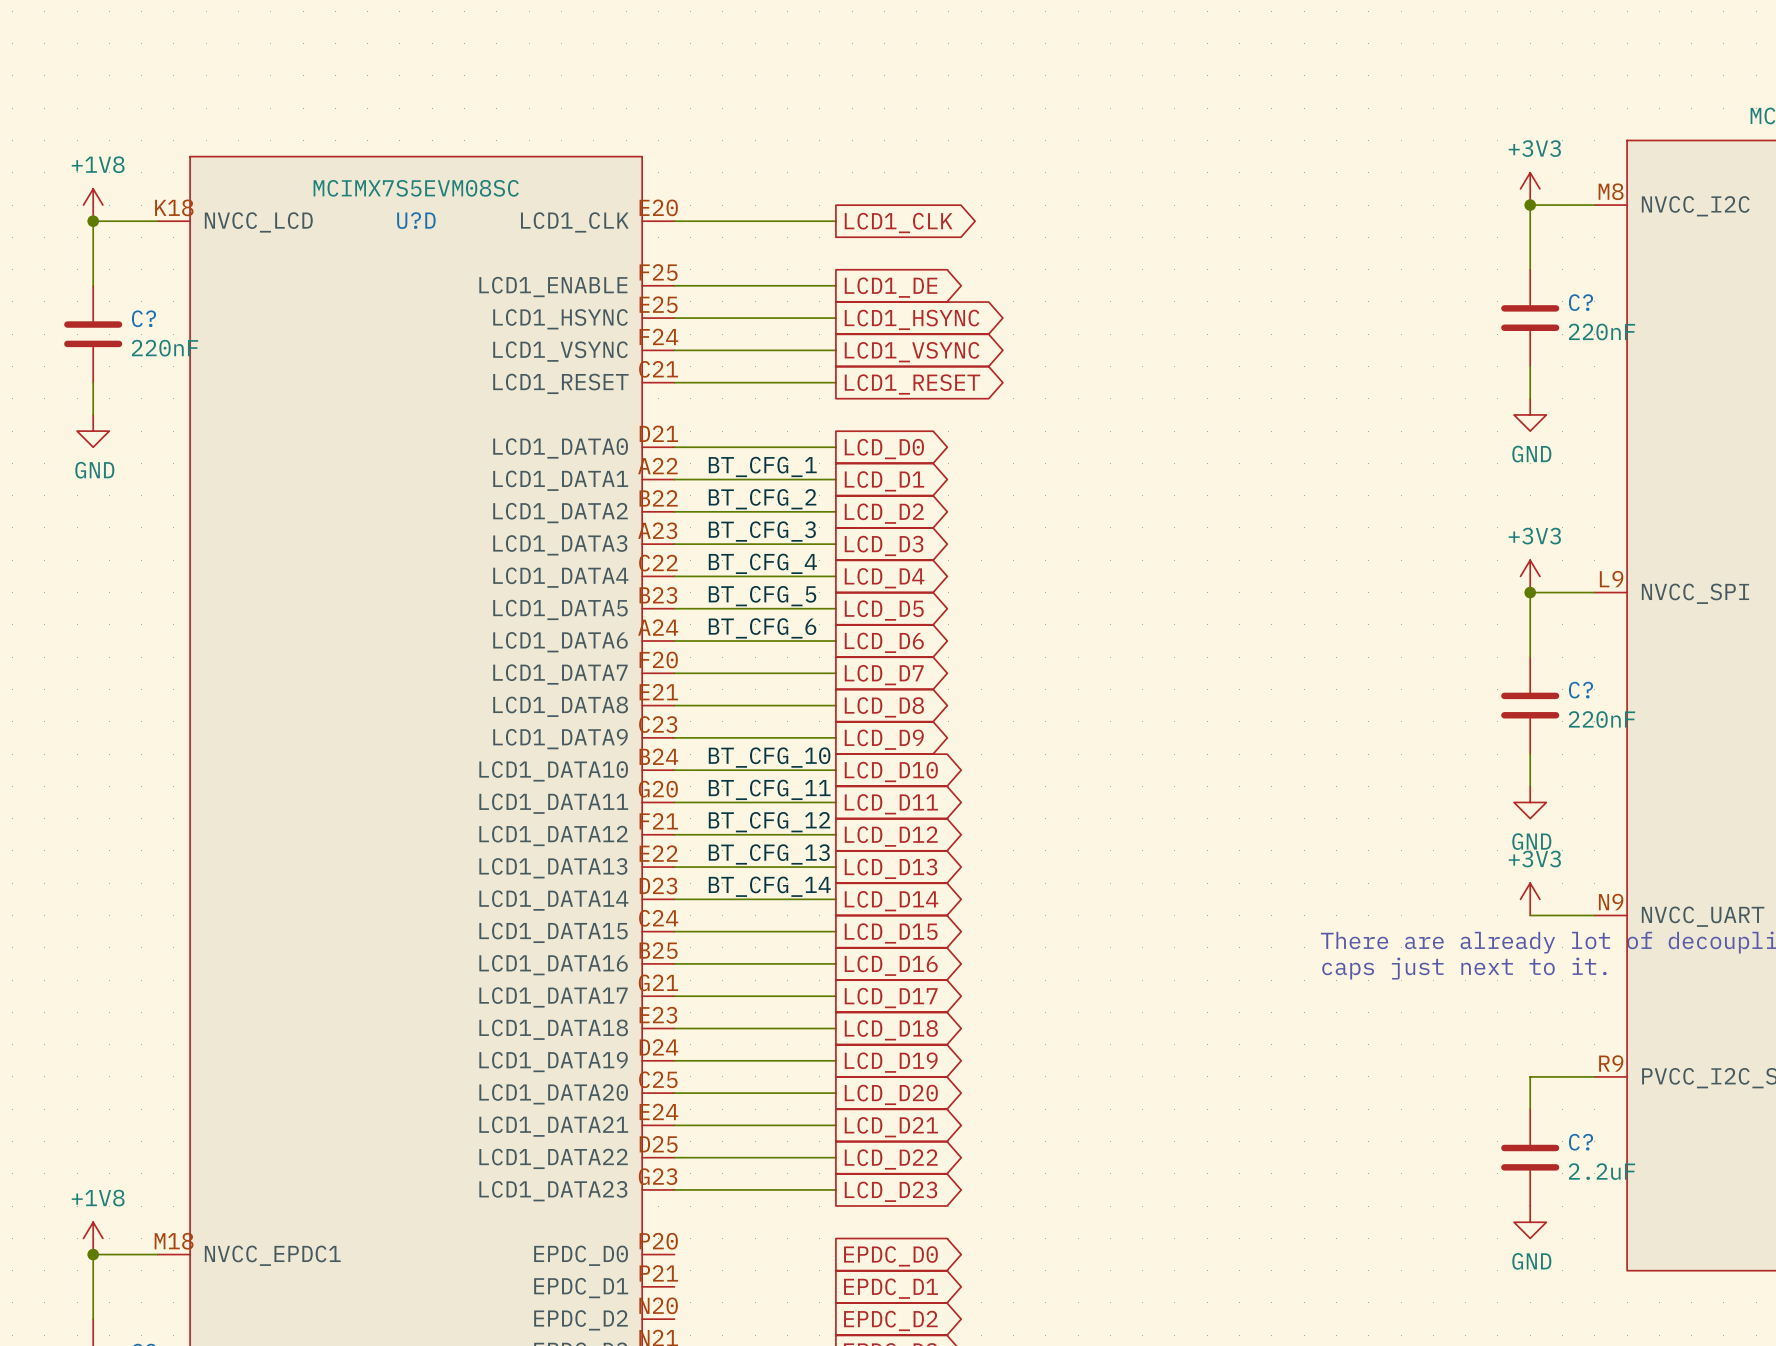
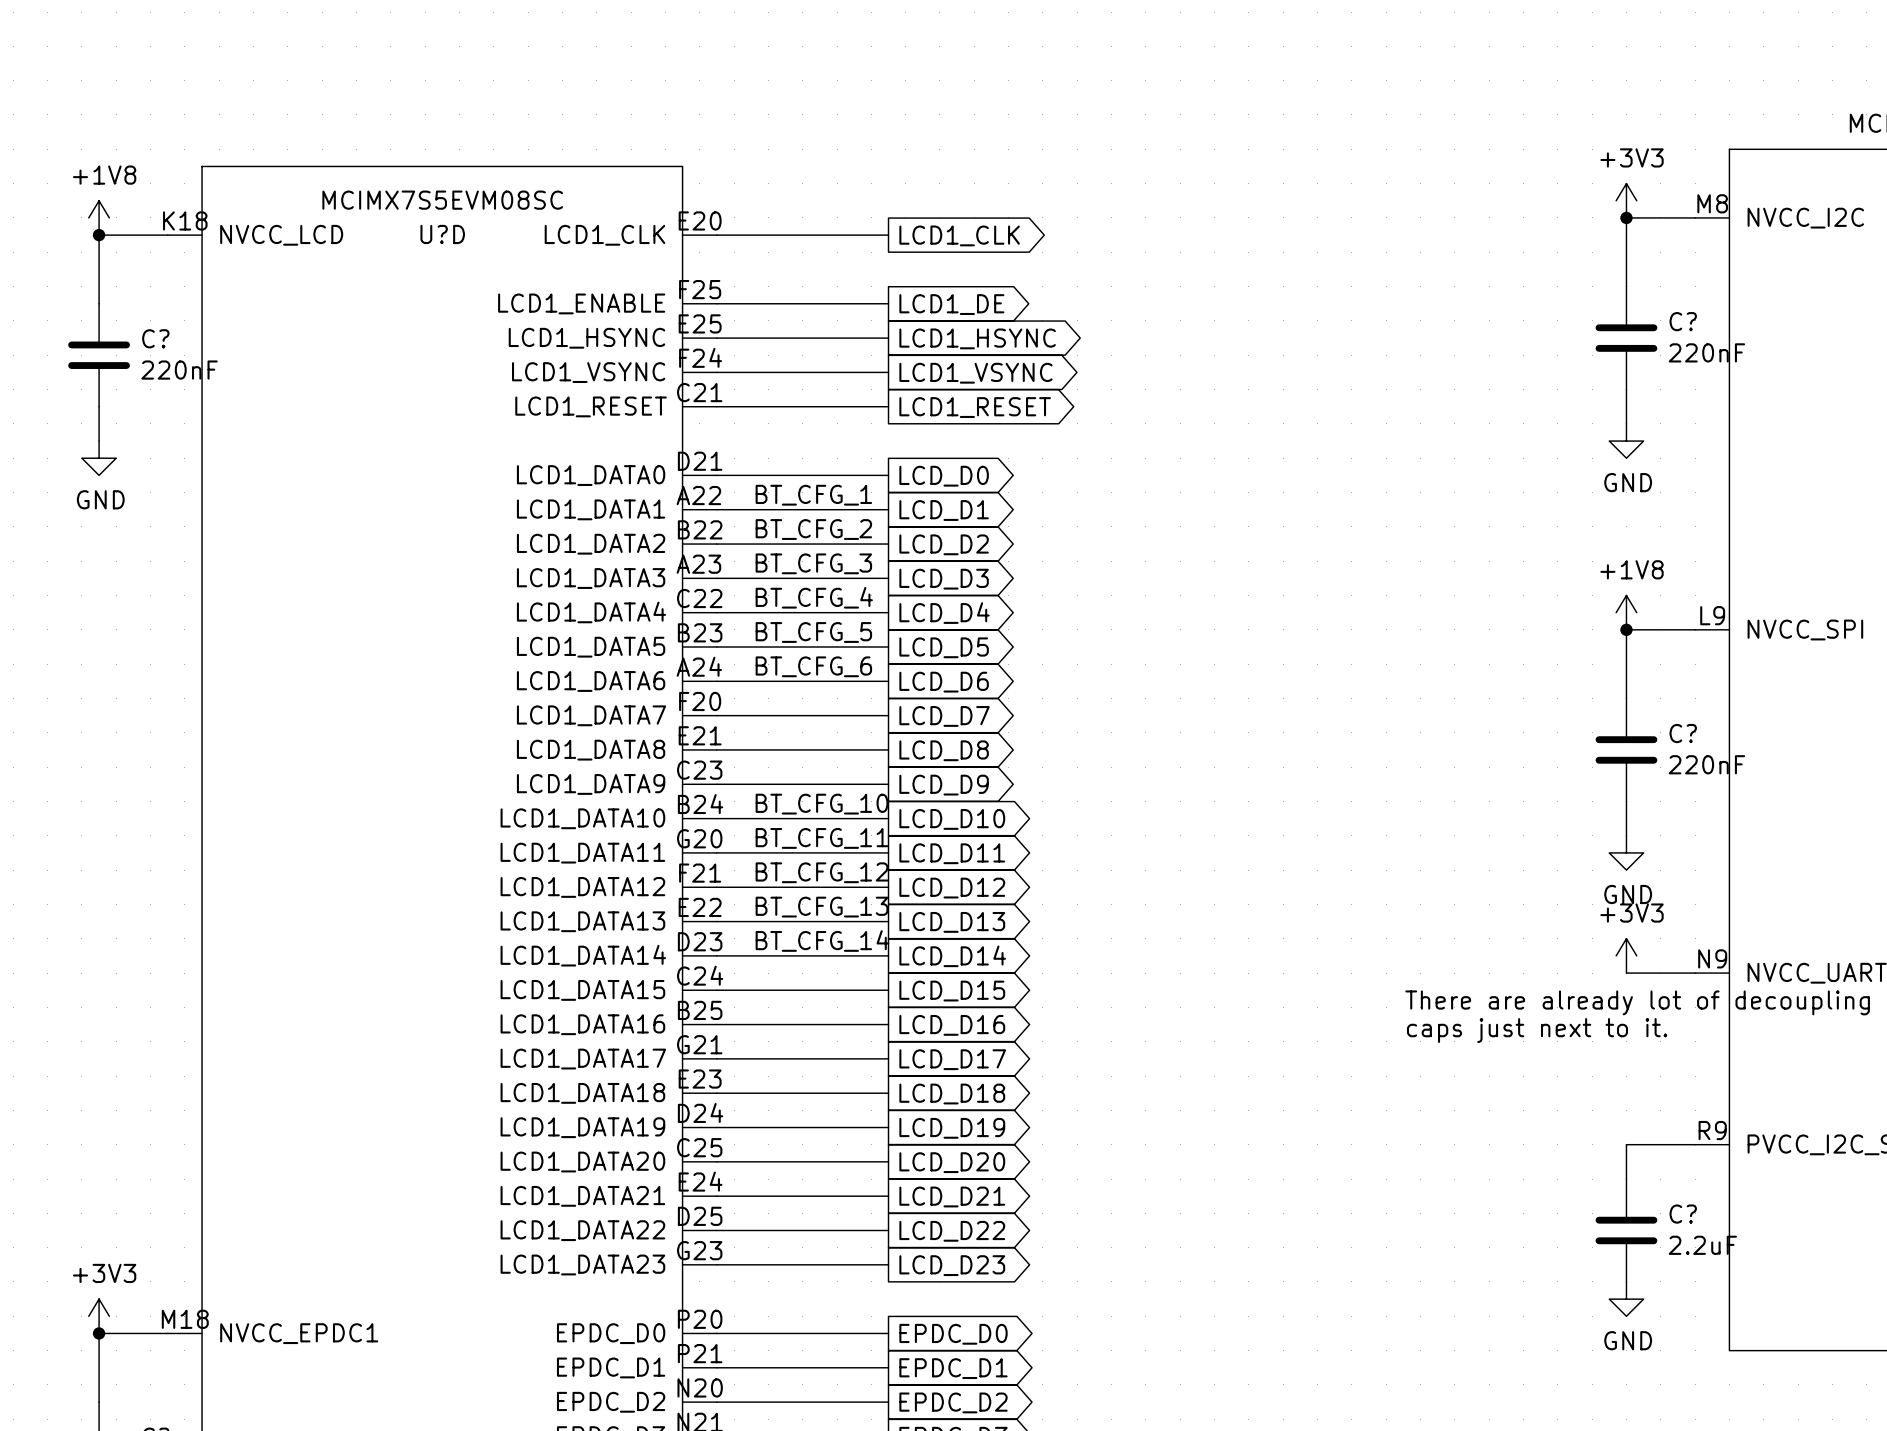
power symbol: +3V3 (1530, 576) -> +1V8 (1626, 612)
power symbol: +1V8 (93, 1238) -> +3V3 (99, 1316)
wire: none -> (716, 1333) (888, 1333)
wire: none -> (716, 1367) (888, 1367)
wire: none -> (716, 1402) (888, 1402)

